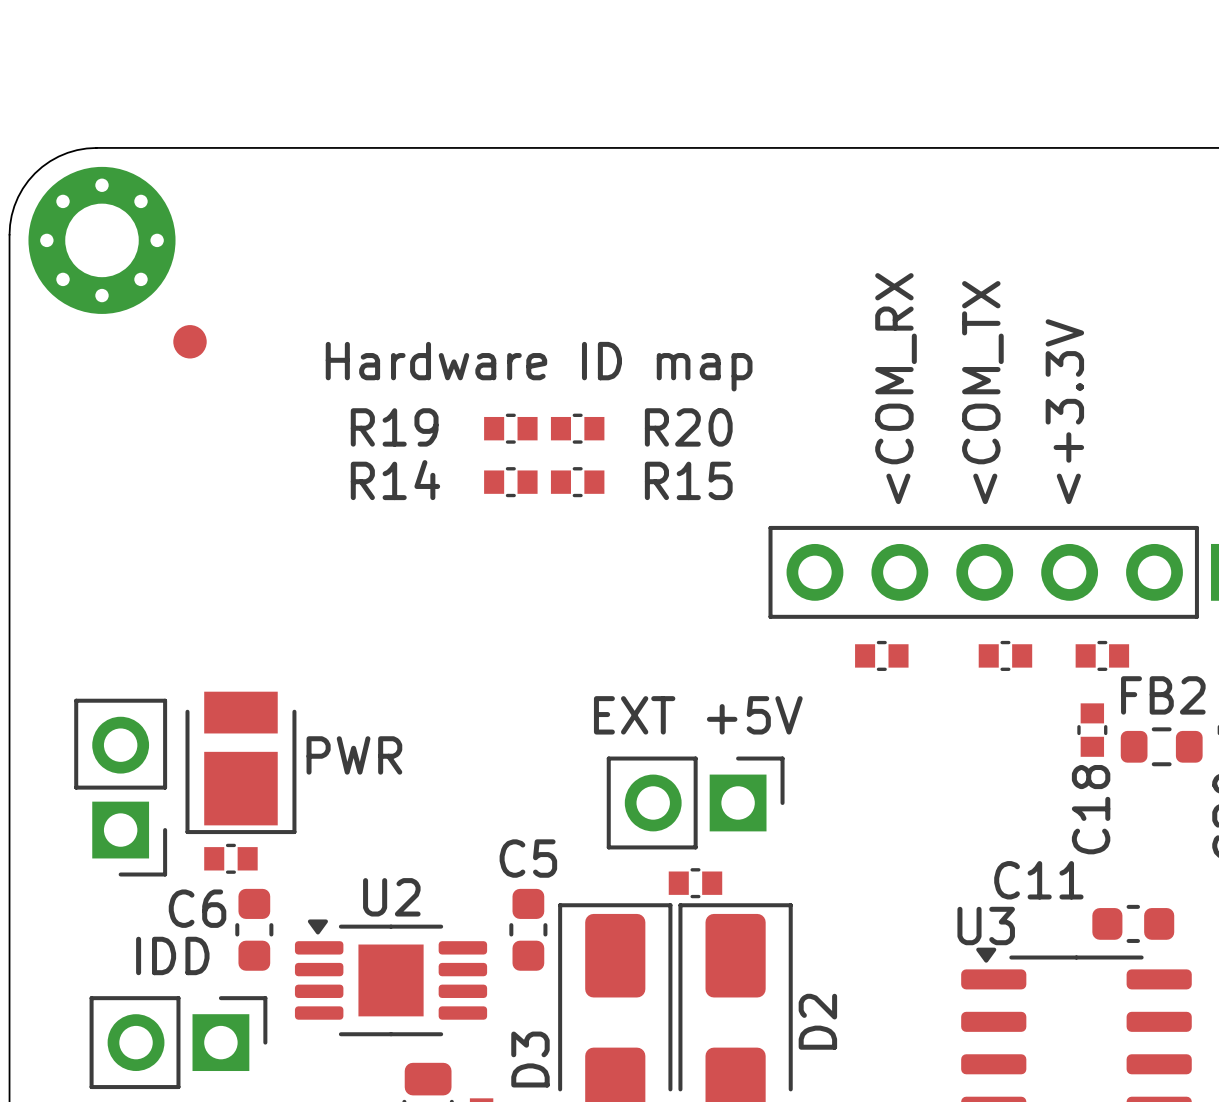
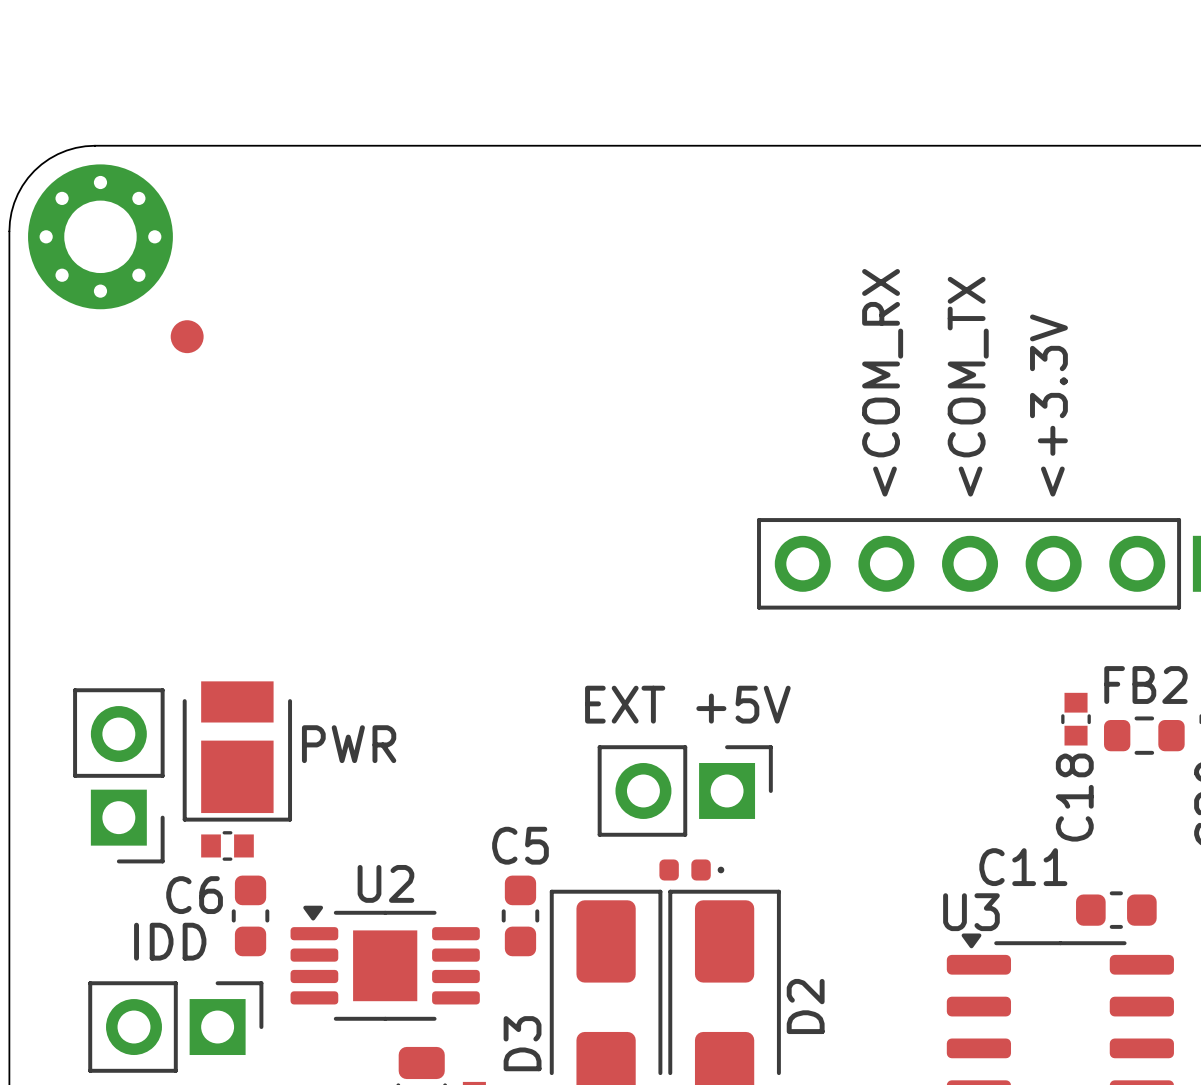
text: Hardware ID map (539, 366) -> none
R19: (510, 428) -> none
R20: (577, 428) -> none
R14: (510, 482) -> none
R15: (577, 482) -> none
part: (881, 655) -> none
part: (1005, 655) -> none
part: (1102, 655) -> none
part footprint: [668, 868, 723, 899] -> [659, 859, 725, 881]

